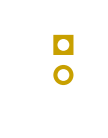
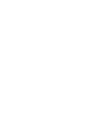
part: (63, 59) -> none

